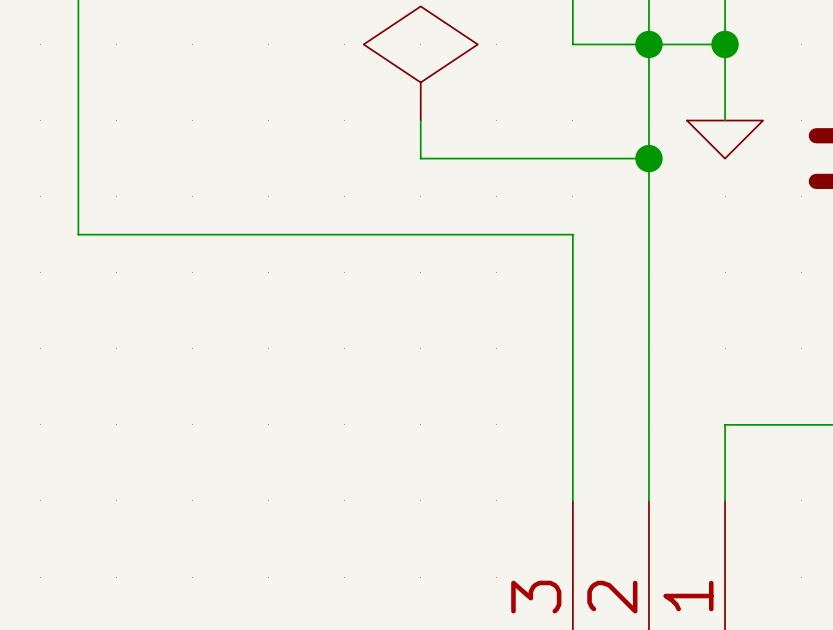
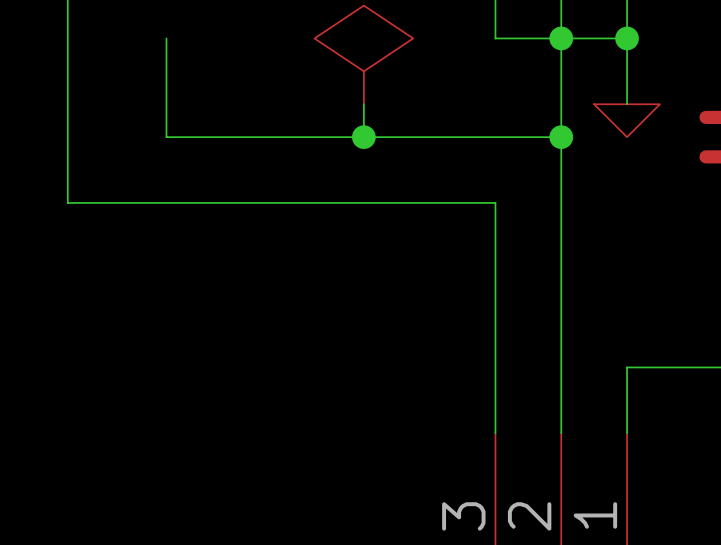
wire: none -> (166, 38) (166, 137) (363, 137)
junction: none -> (363, 137)

